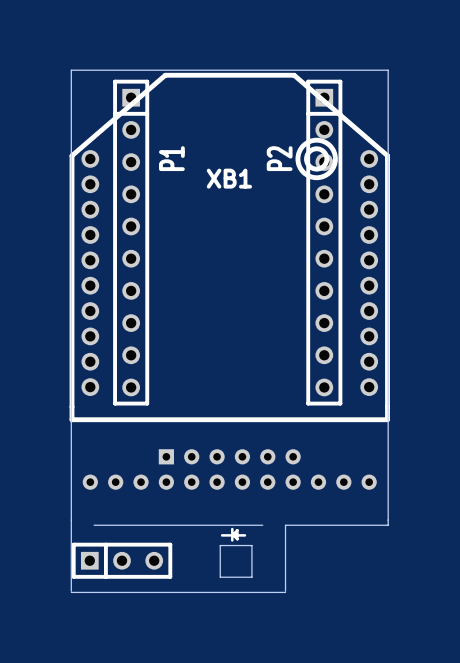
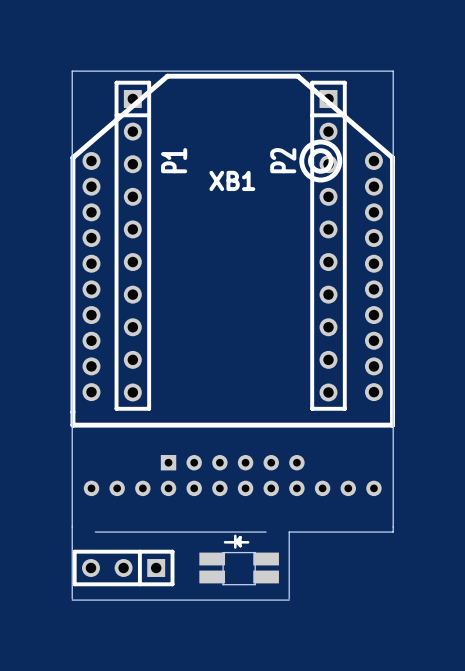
part rotation: 0° (122, 560) -> 180° (123, 567)
part: none -> (239, 567)

